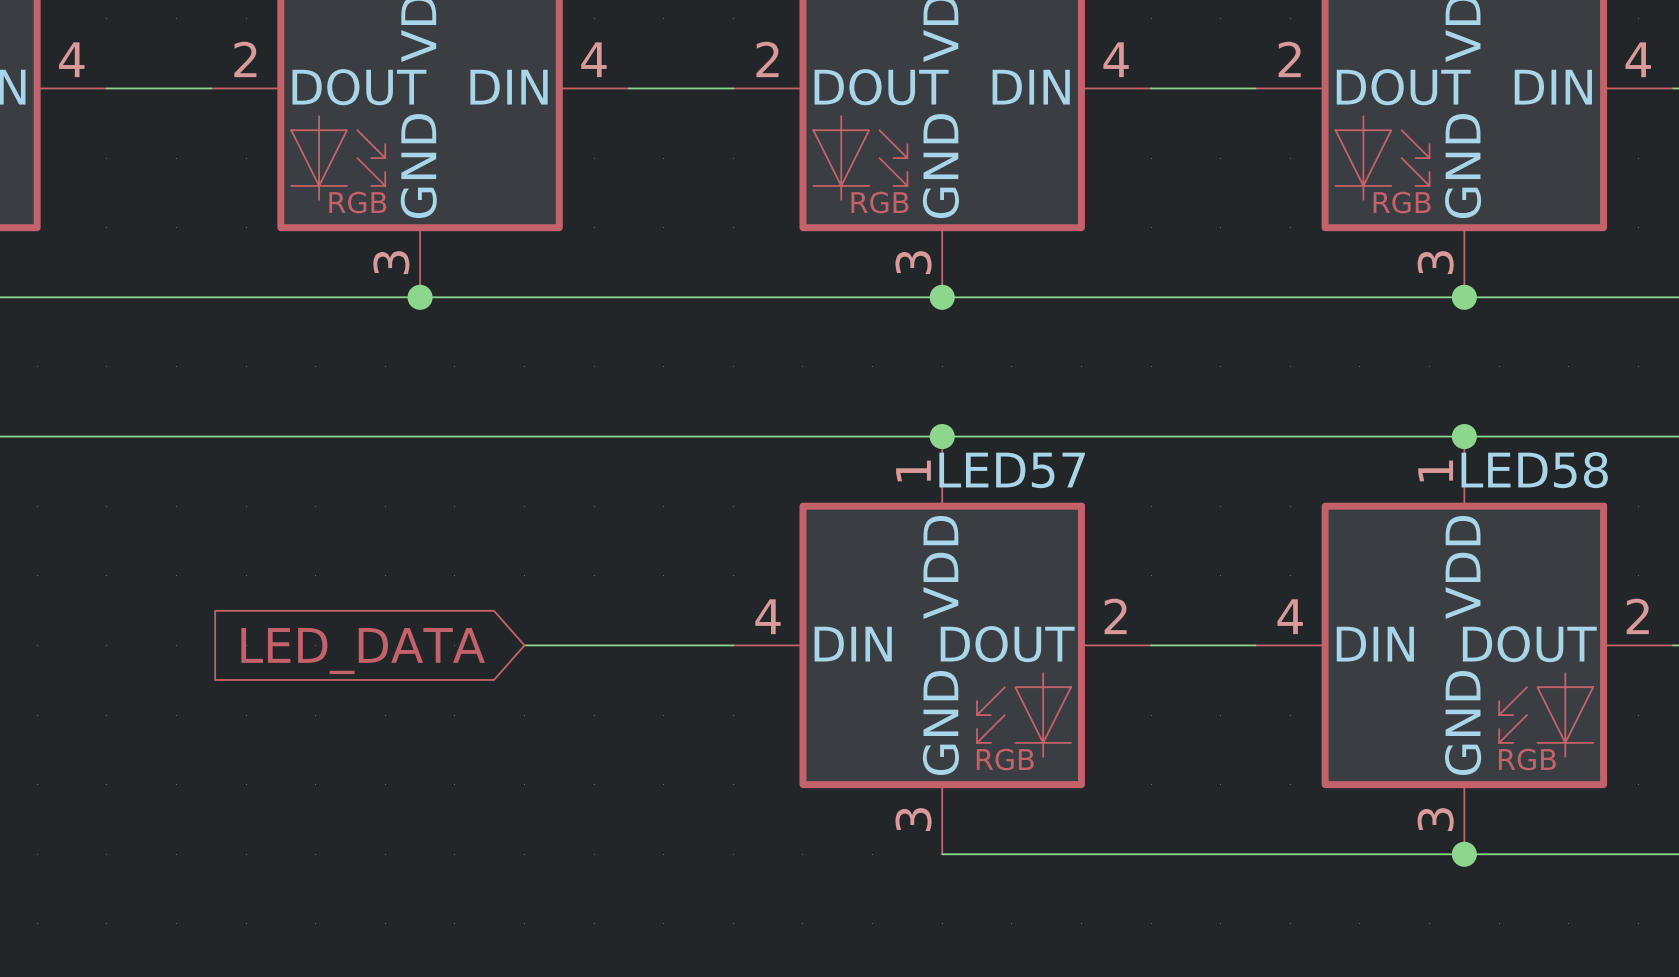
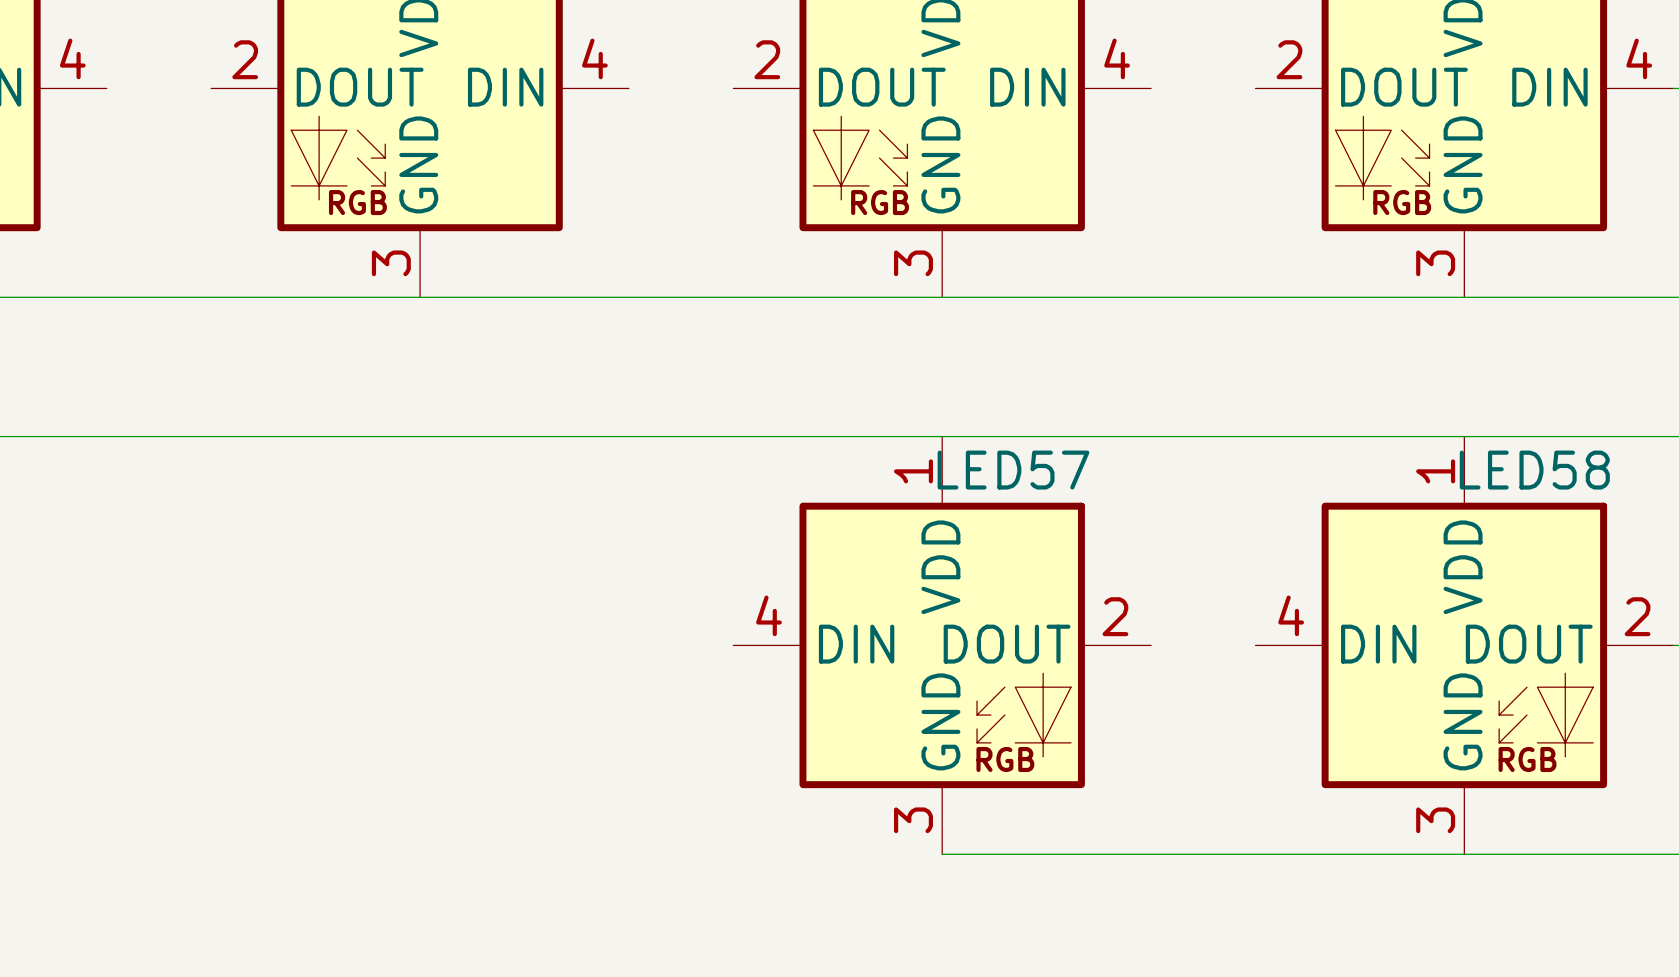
wire: (106, 88) (211, 88) -> none
wire: (628, 88) (733, 88) -> none
wire: (1151, 88) (1255, 88) -> none
junction: (420, 297) -> none
junction: (942, 297) -> none
junction: (1464, 297) -> none
junction: (942, 436) -> none
junction: (1464, 436) -> none
wire: (524, 645) (733, 645) -> none
wire: (1151, 645) (1255, 645) -> none
global label: LED_DATA (363, 651) -> none
junction: (1464, 854) -> none

